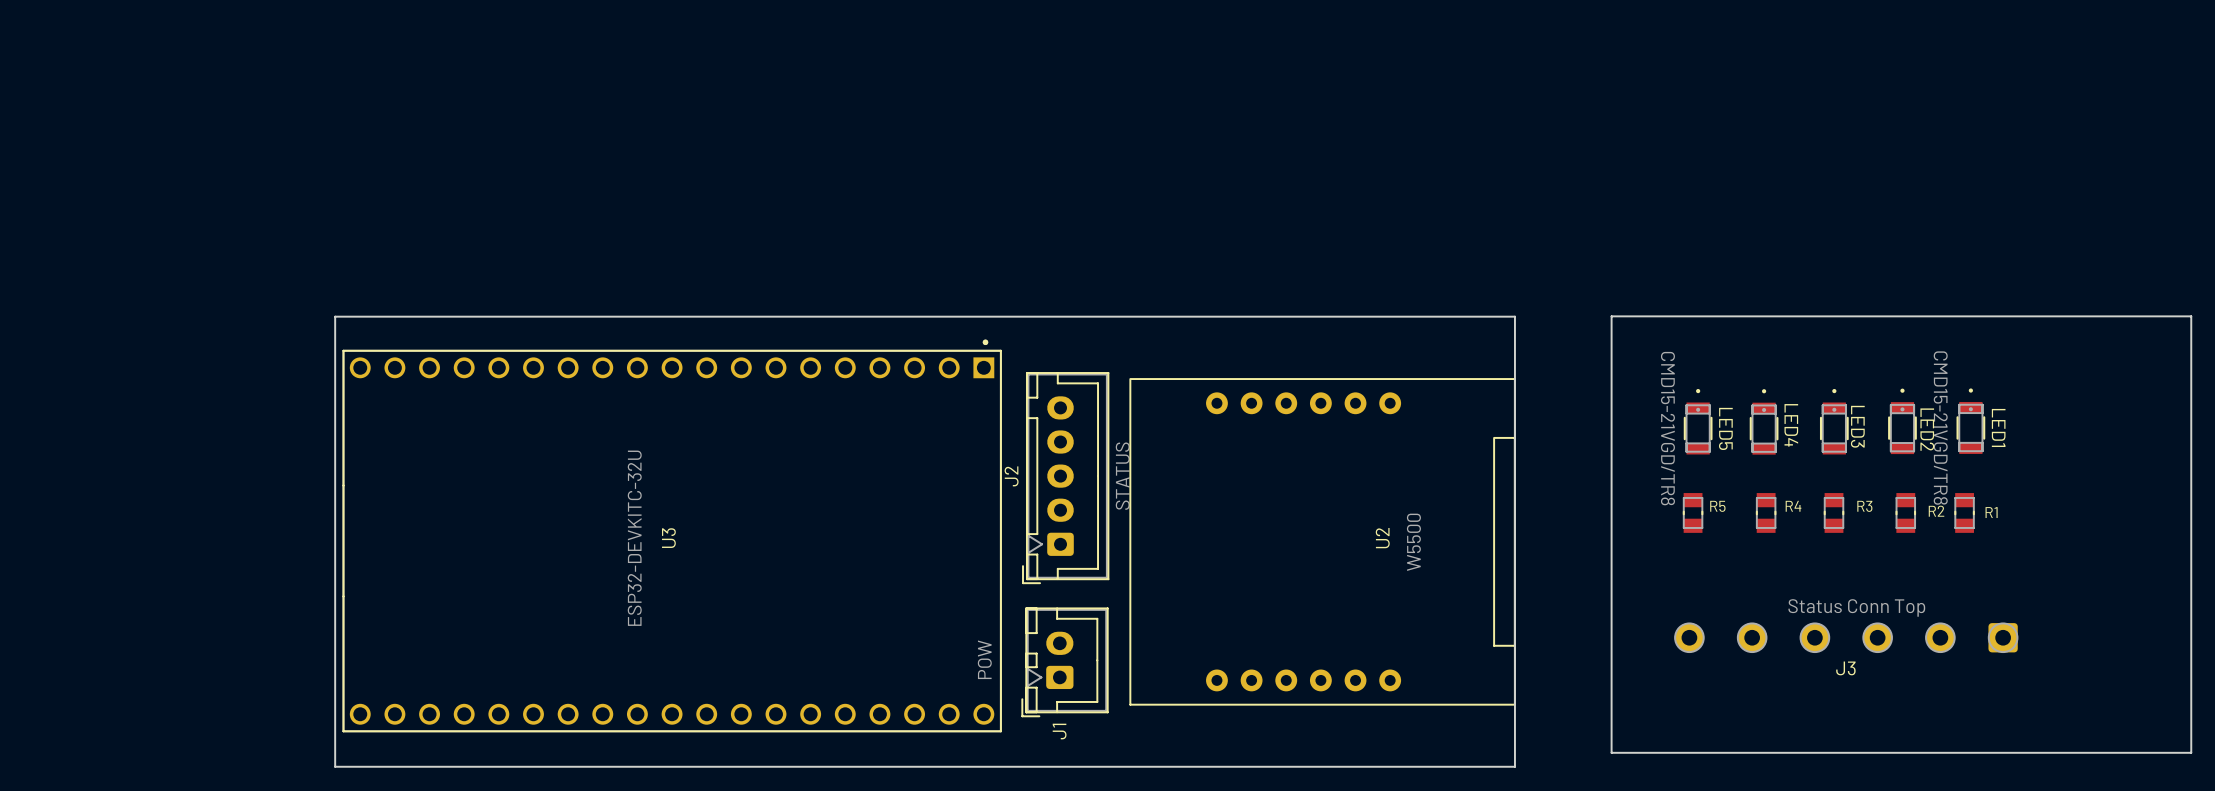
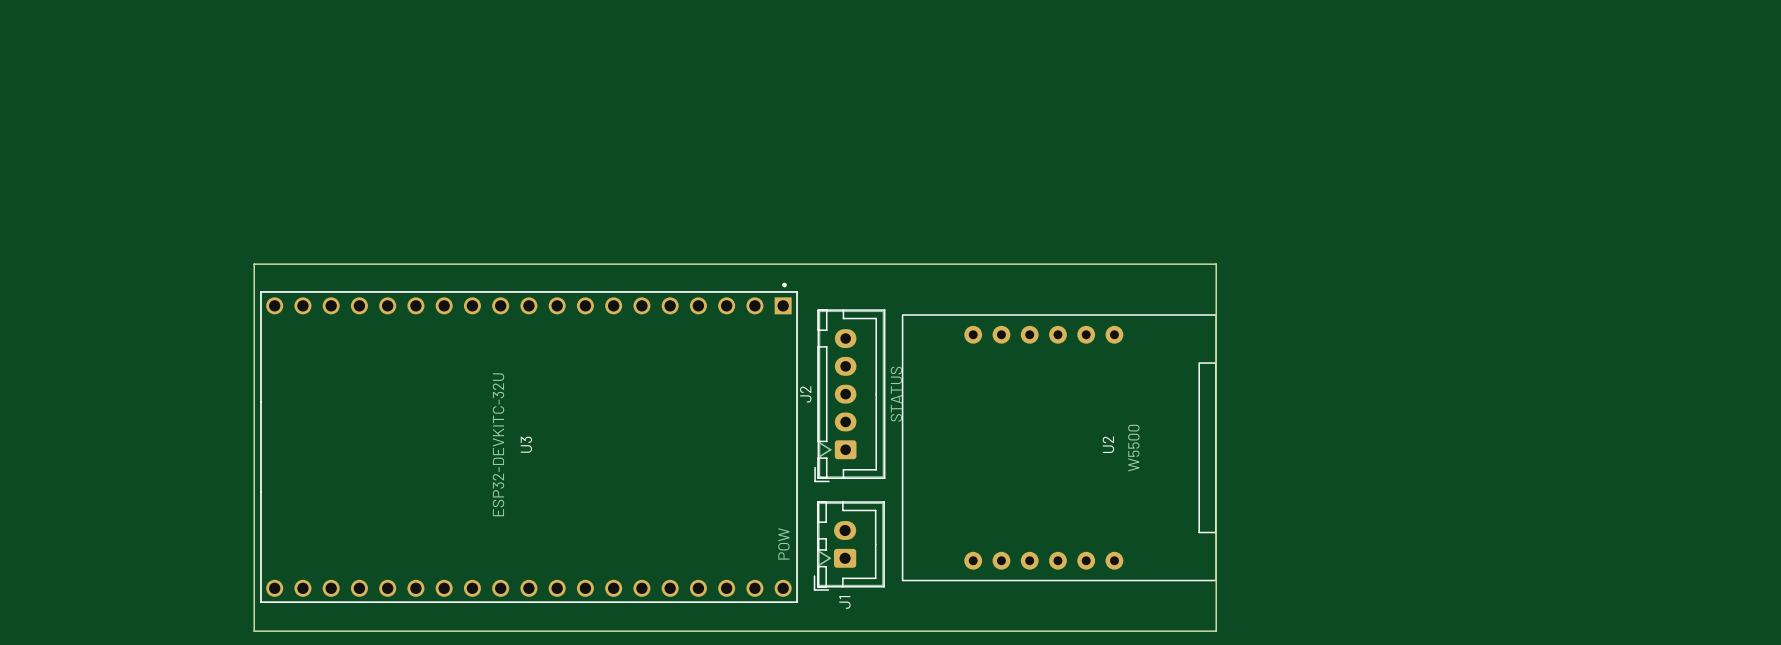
board edge: (1611, 316) (2191, 316) (2191, 752) (1611, 752) (1611, 316) -> none
LED5: CMD15-21VGD/TR8 (1698, 421) -> none
LED4: (1764, 421) -> none
LED3: (1834, 421) -> none
LED2: (1902, 421) -> none
LED1: CMD15-21VGD/TR8 (1970, 421) -> none
R5: (1693, 512) -> none
R4: (1766, 512) -> none
R3: (1834, 512) -> none
R2: (1905, 512) -> none
R1: (1964, 512) -> none
J3: Status Conn Top (1846, 637) -> none

